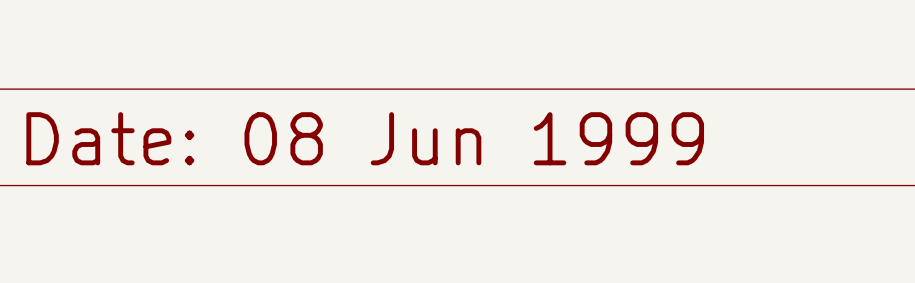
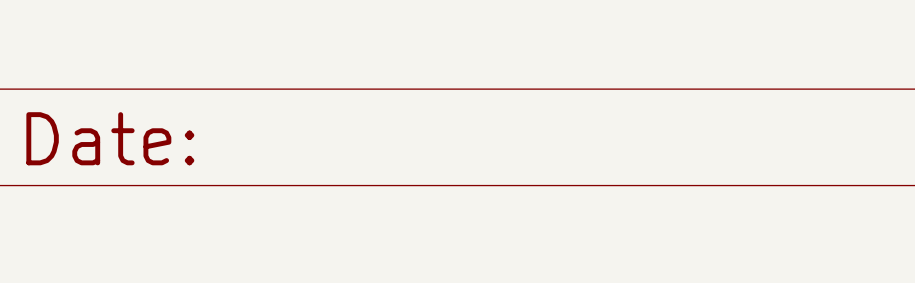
title block: Date: 08 Jun 1999 (365, 138) -> Date: (110, 138)

